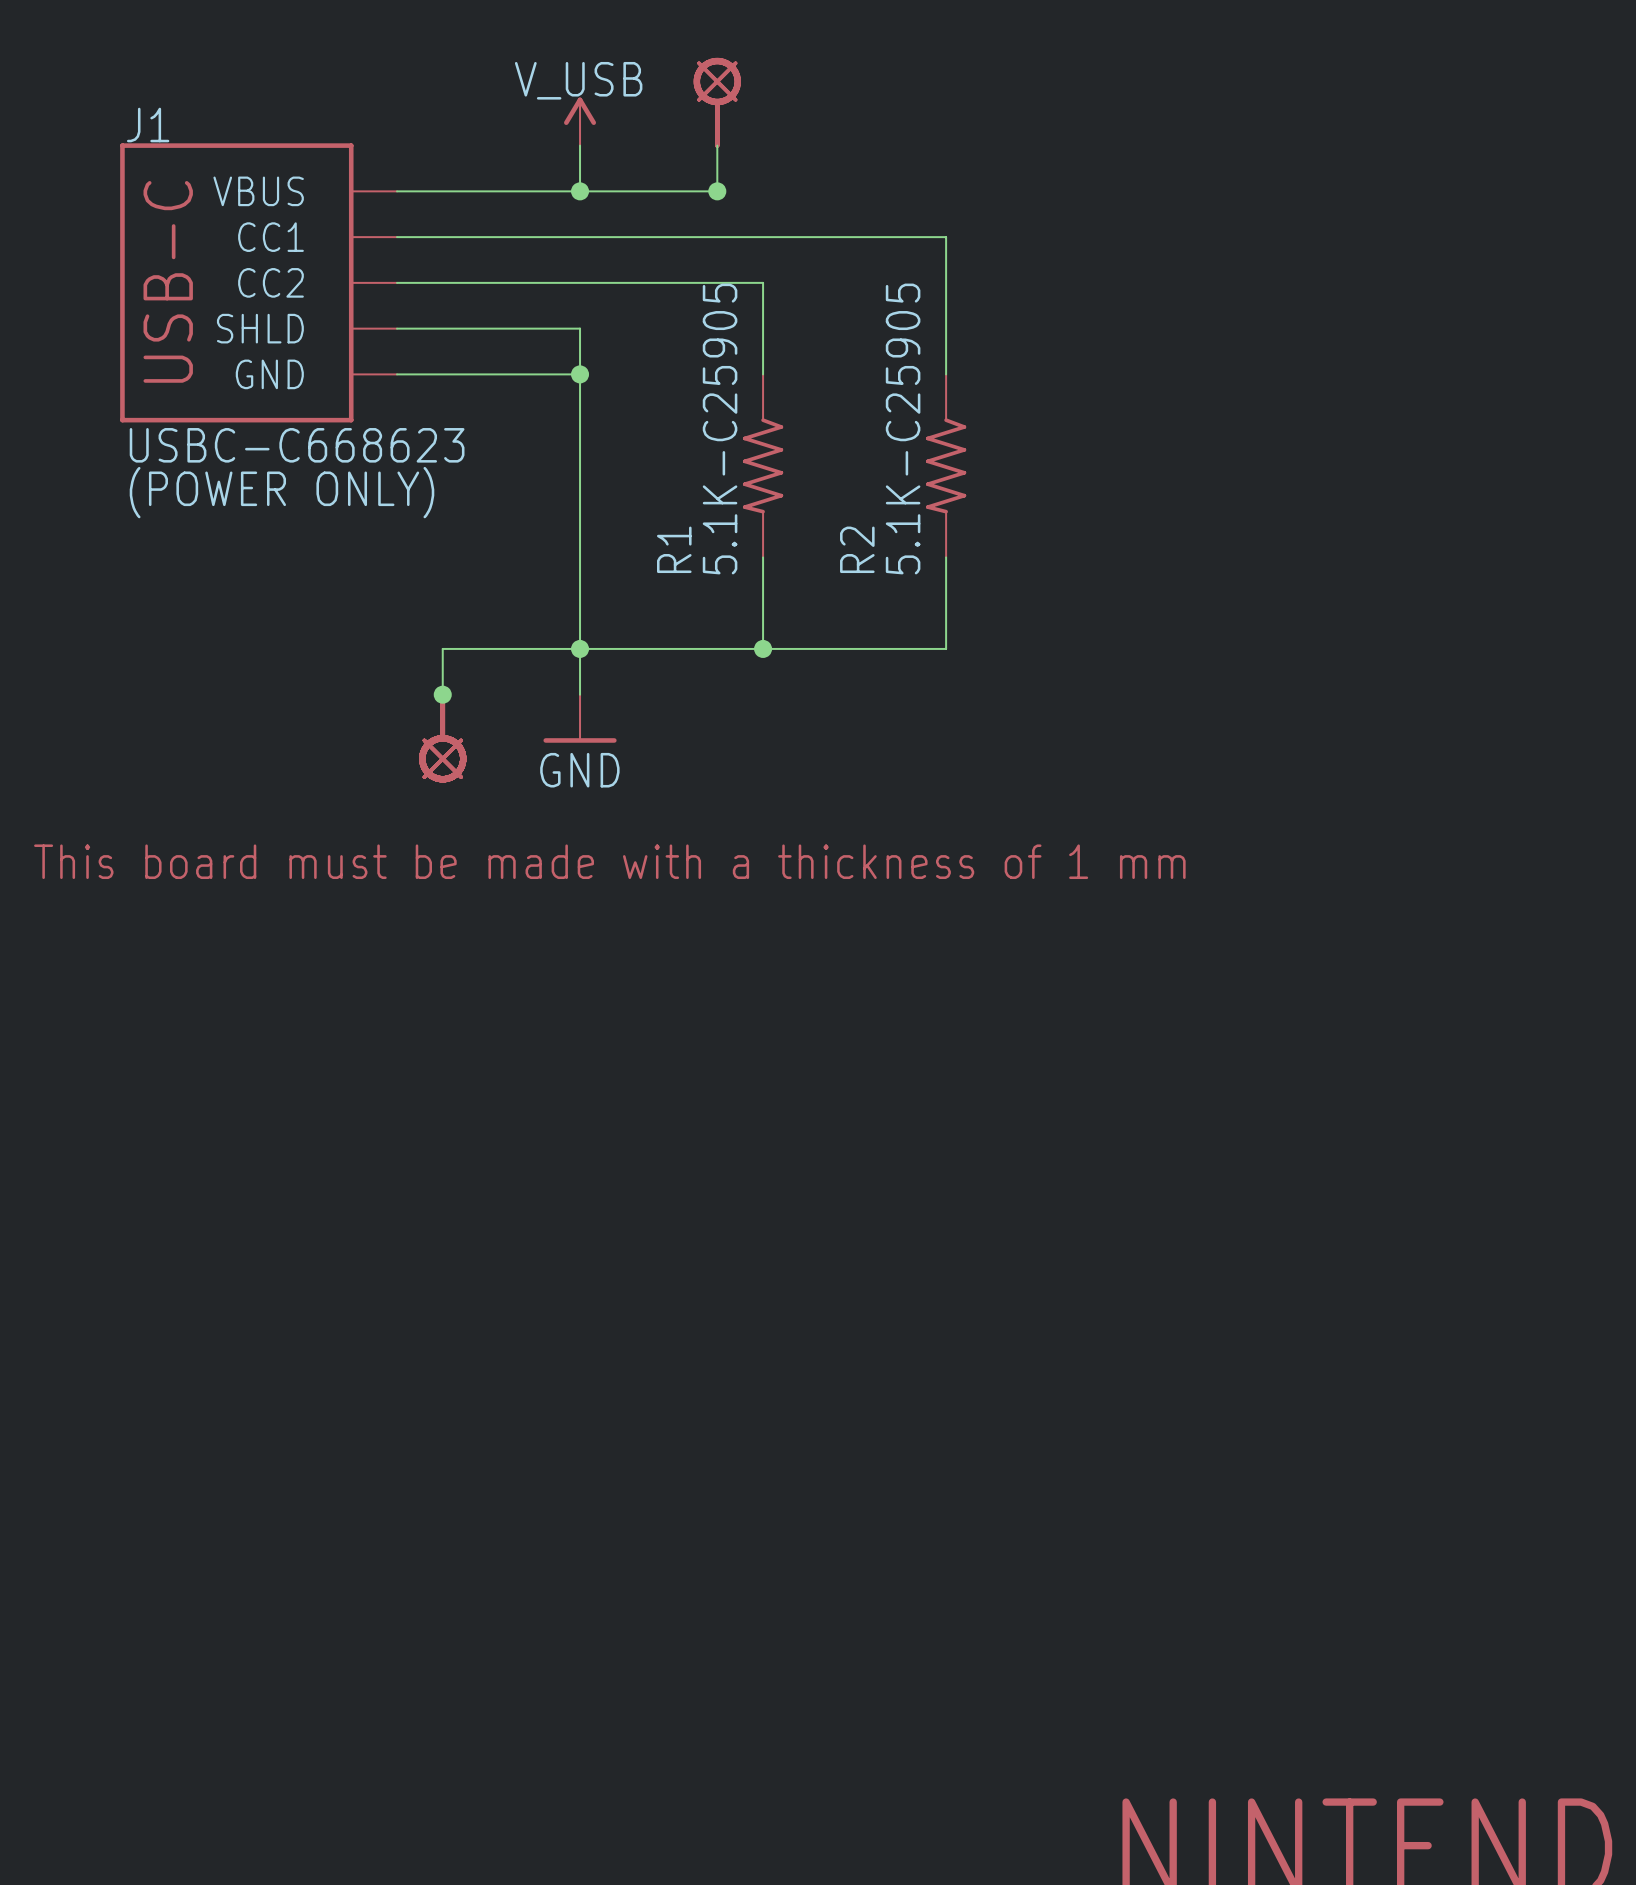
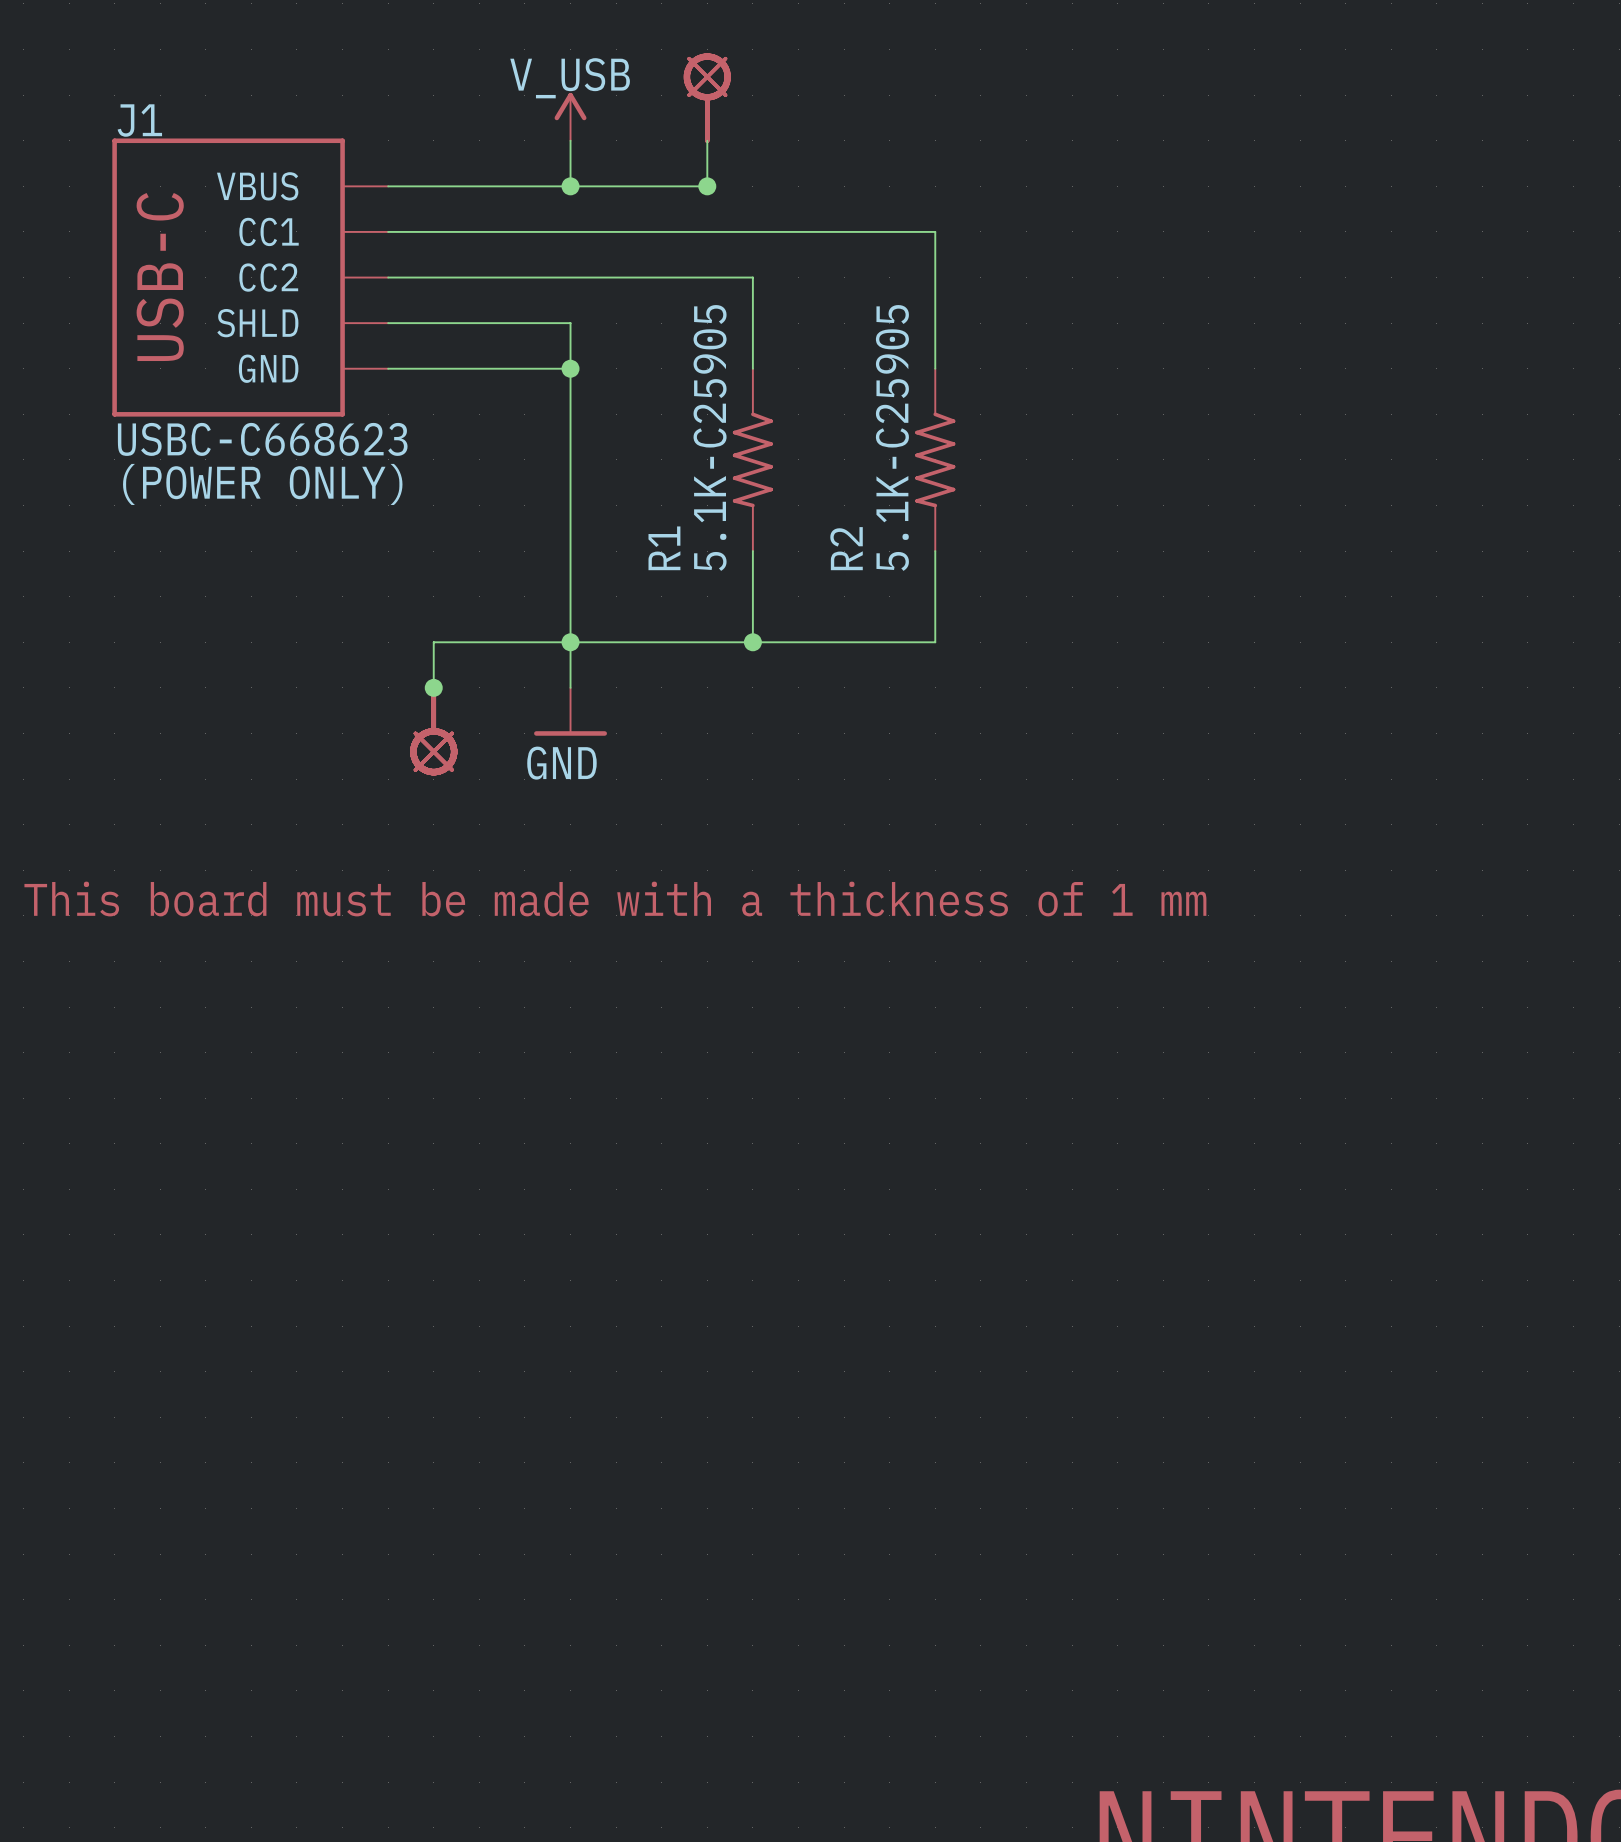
text position: This board must be made with a thickness of 1 mm (609, 861) -> This board must be made with a thickness of 1 mm (615, 899)

